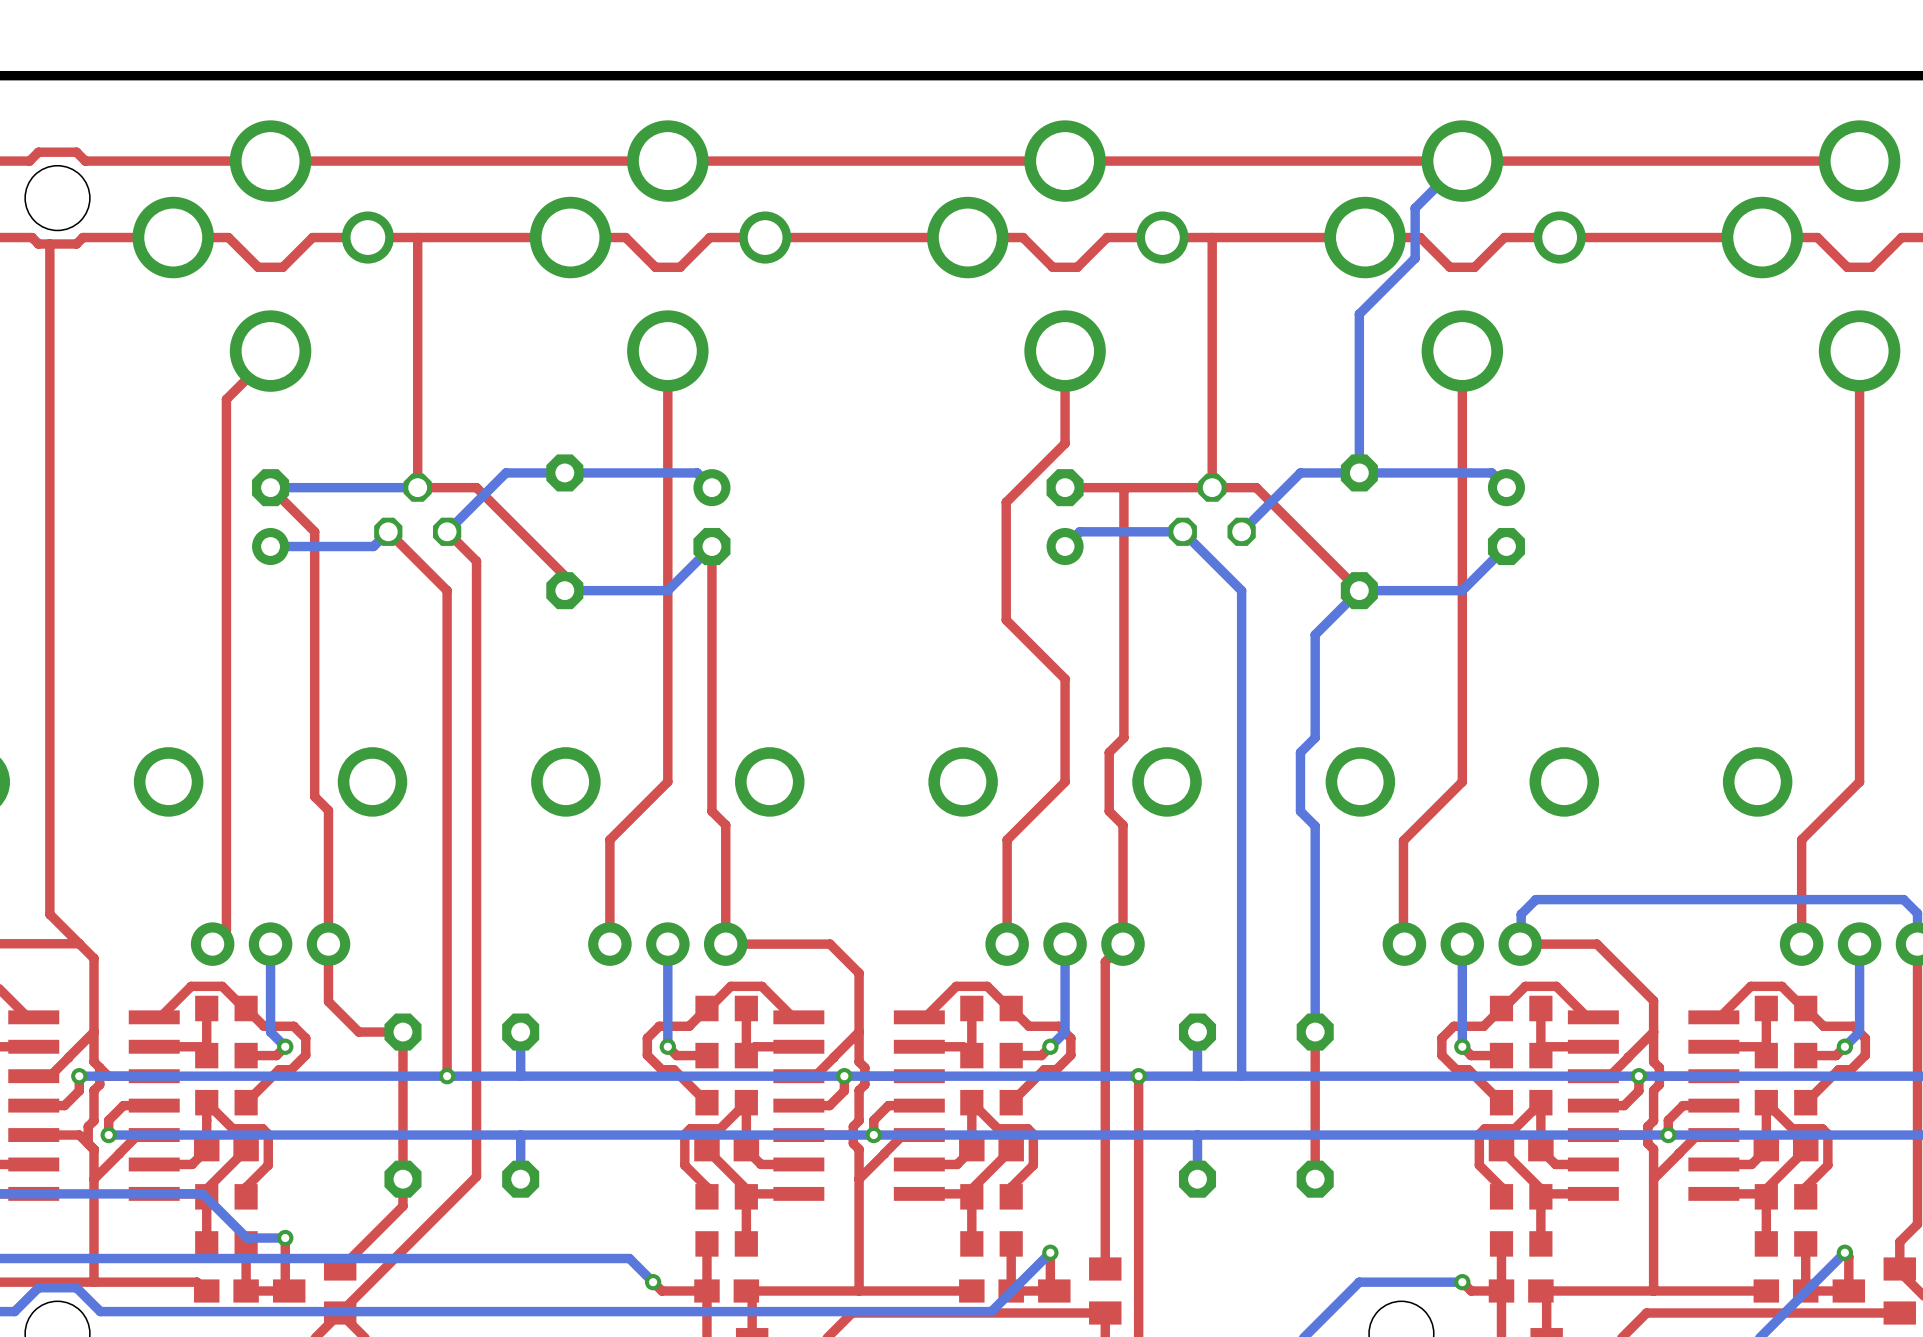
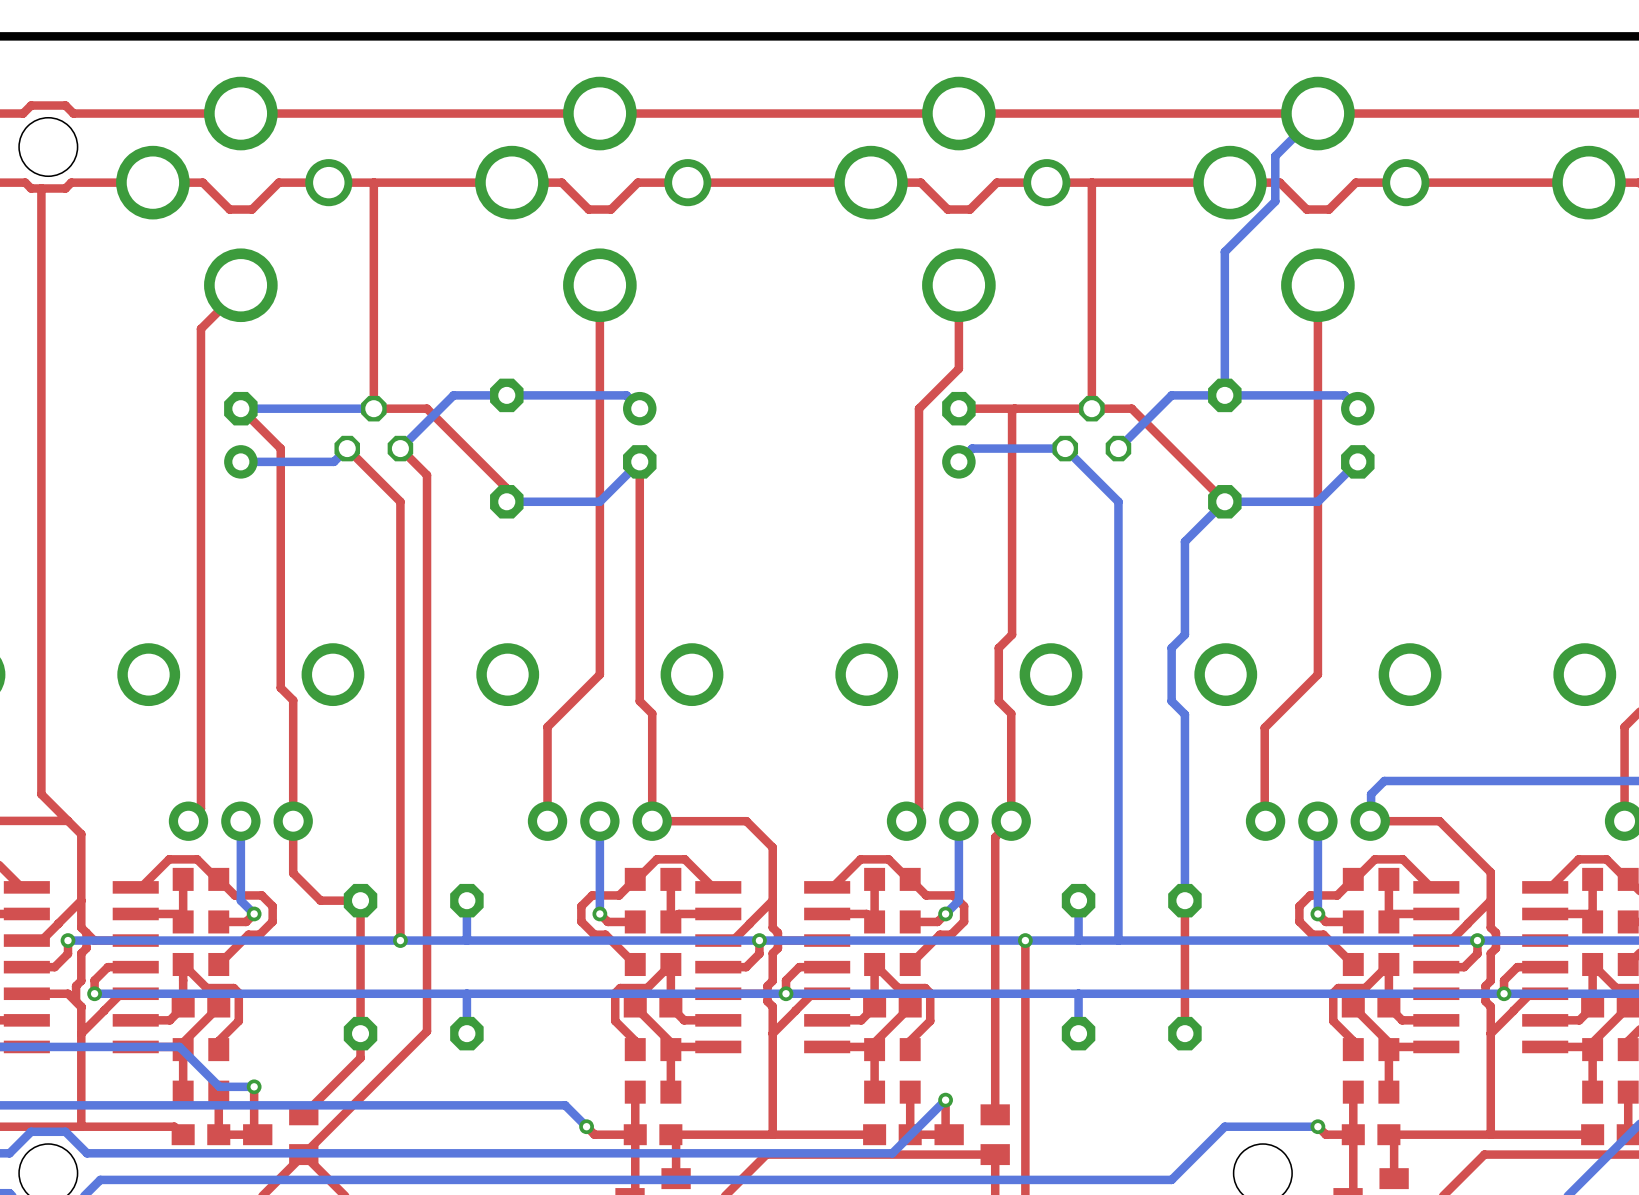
top track: (1020, 487) (1006, 502) (1006, 620) (1065, 678) (1065, 781) (1007, 839) (1007, 944) -> (919, 408) (919, 808) (906, 821)

